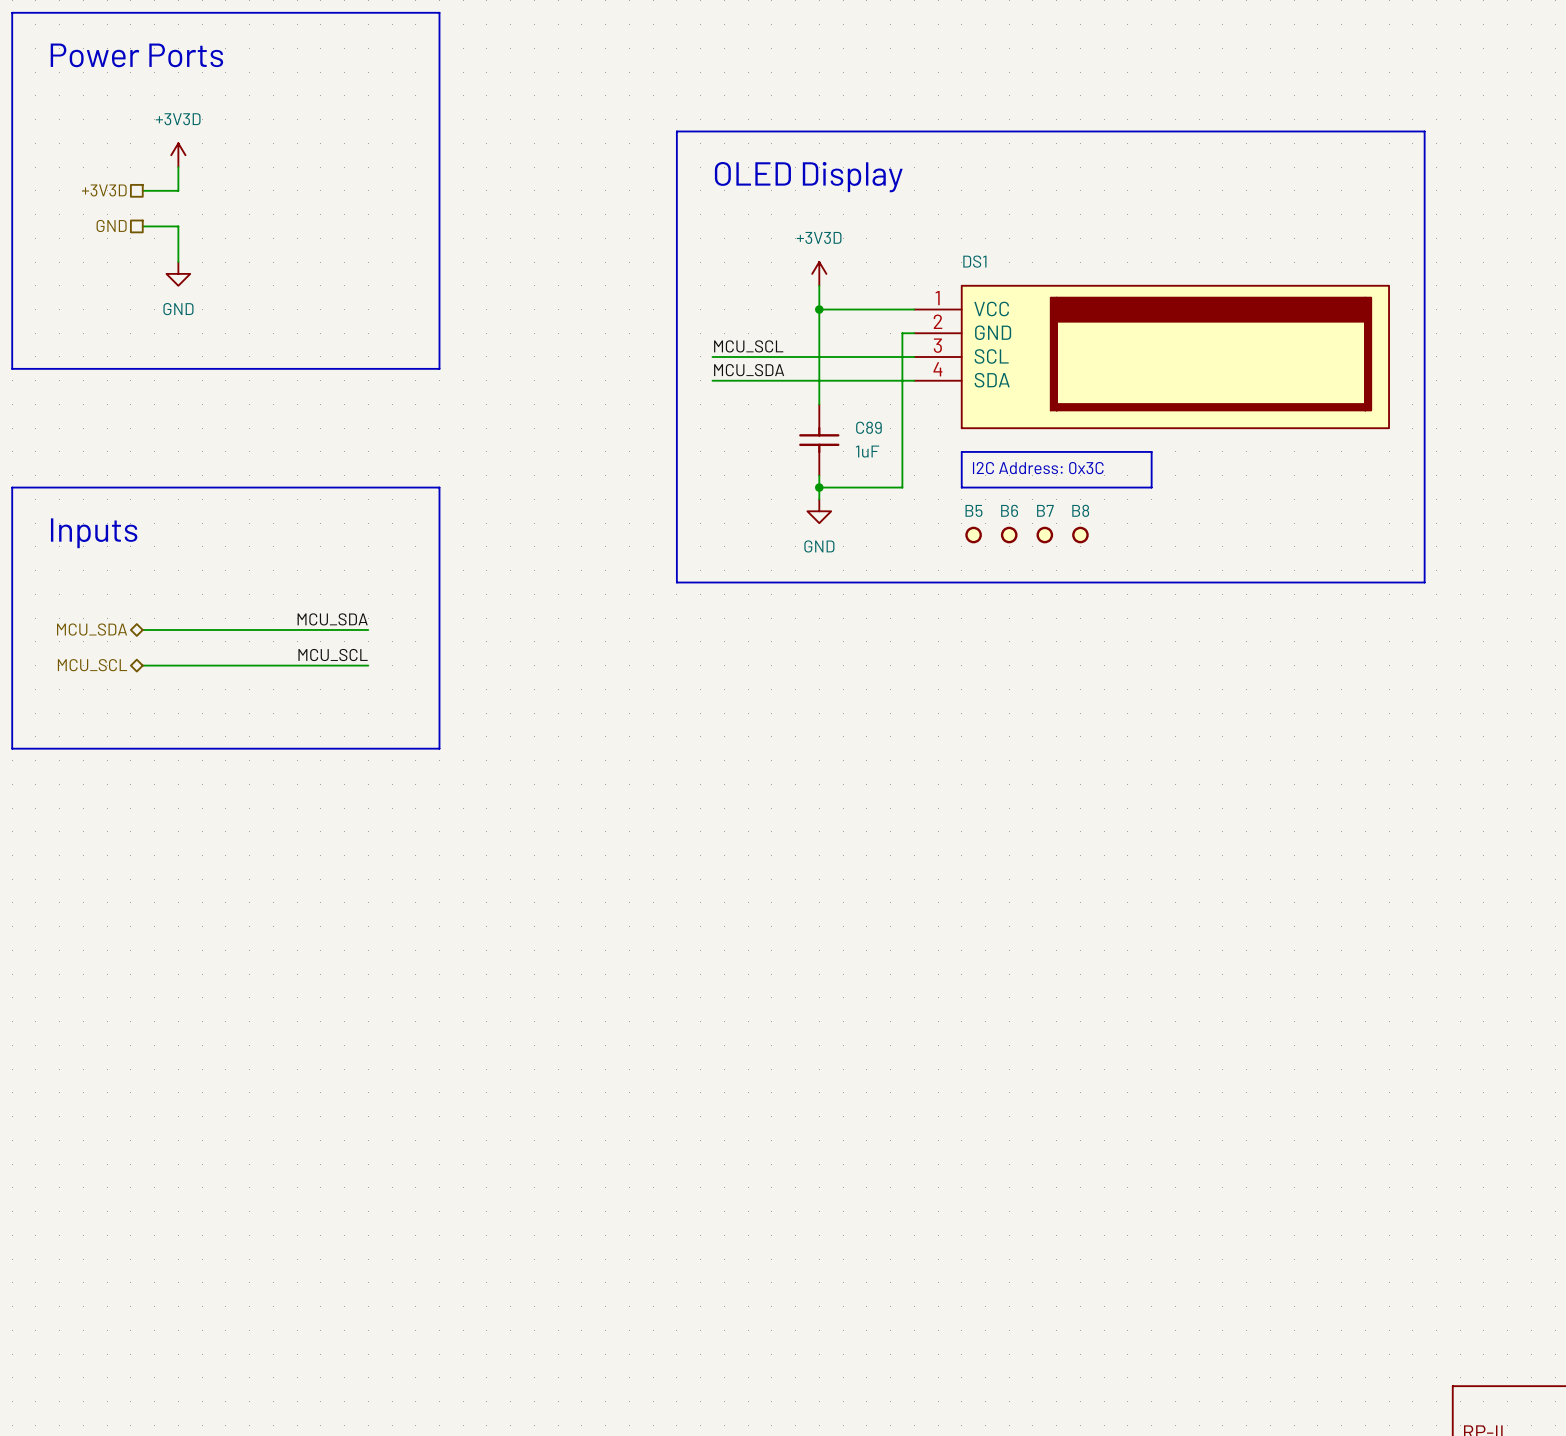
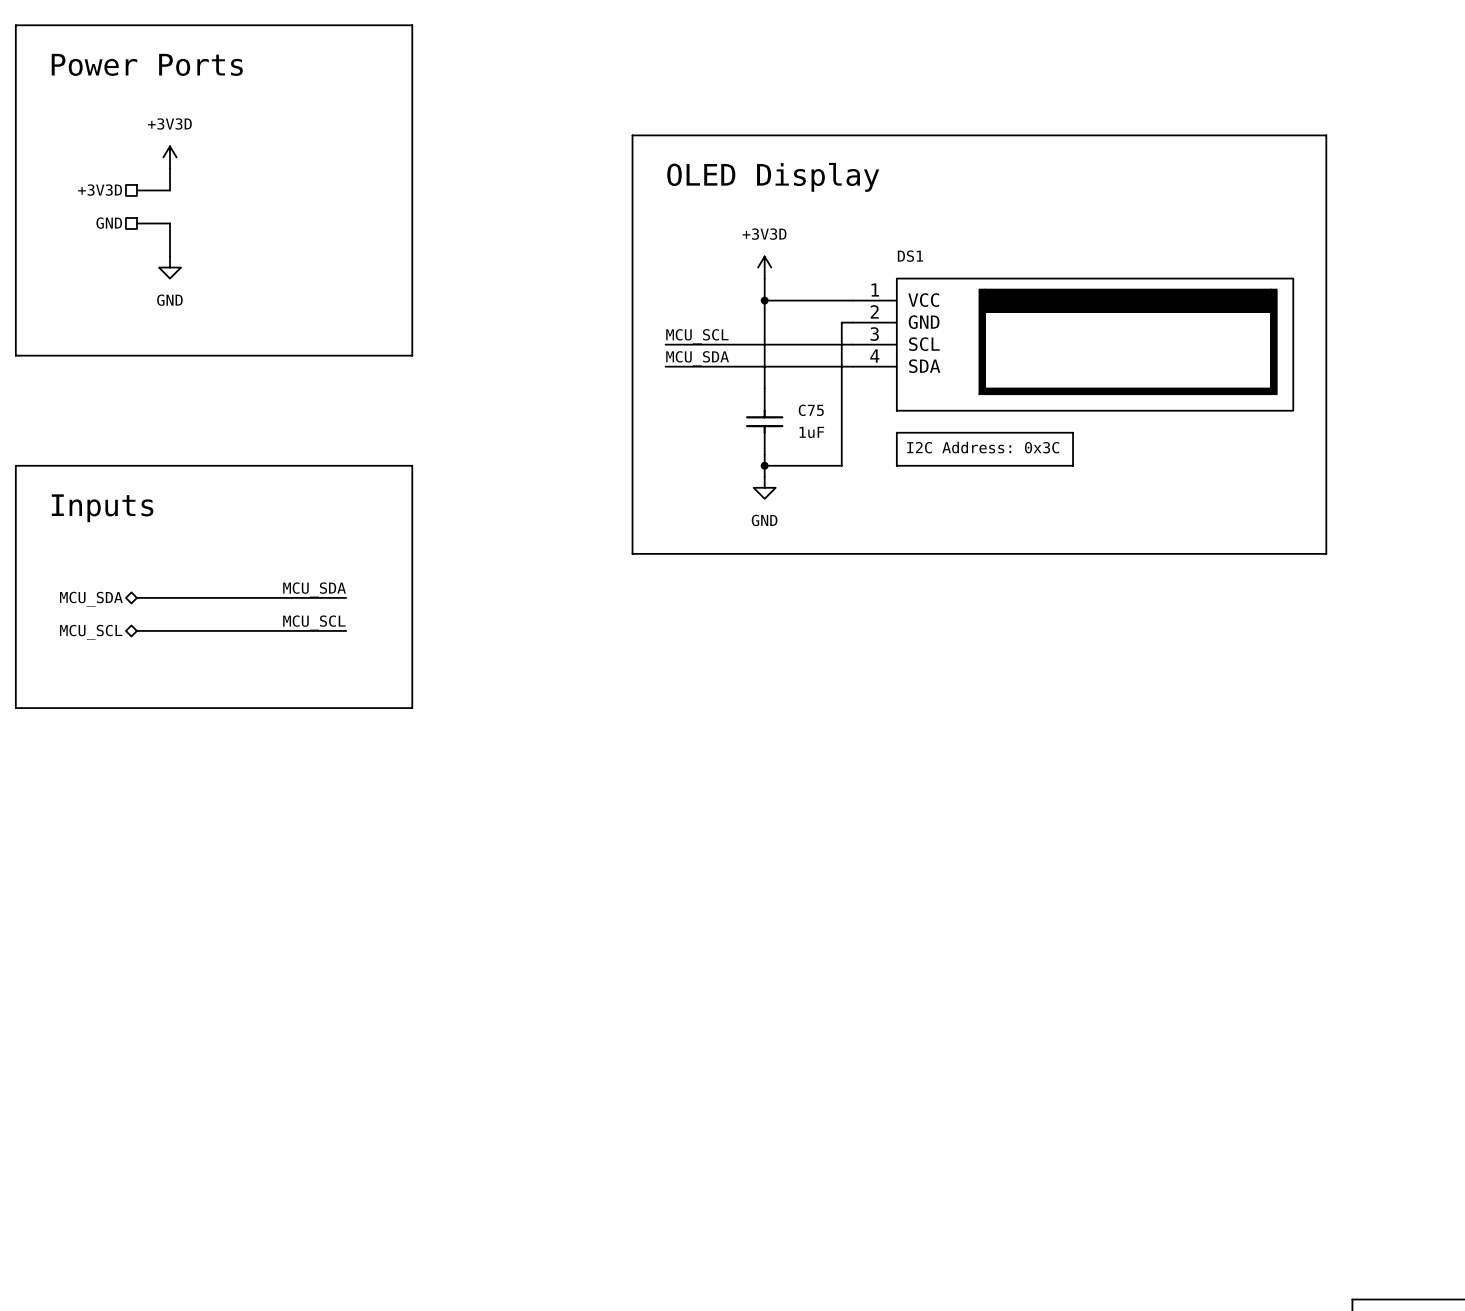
C89 name: C89 (868, 427) -> C75 (811, 410)
B5: (973, 535) -> none
B6: (1009, 535) -> none
B7: (1044, 535) -> none
B8: (1080, 535) -> none

